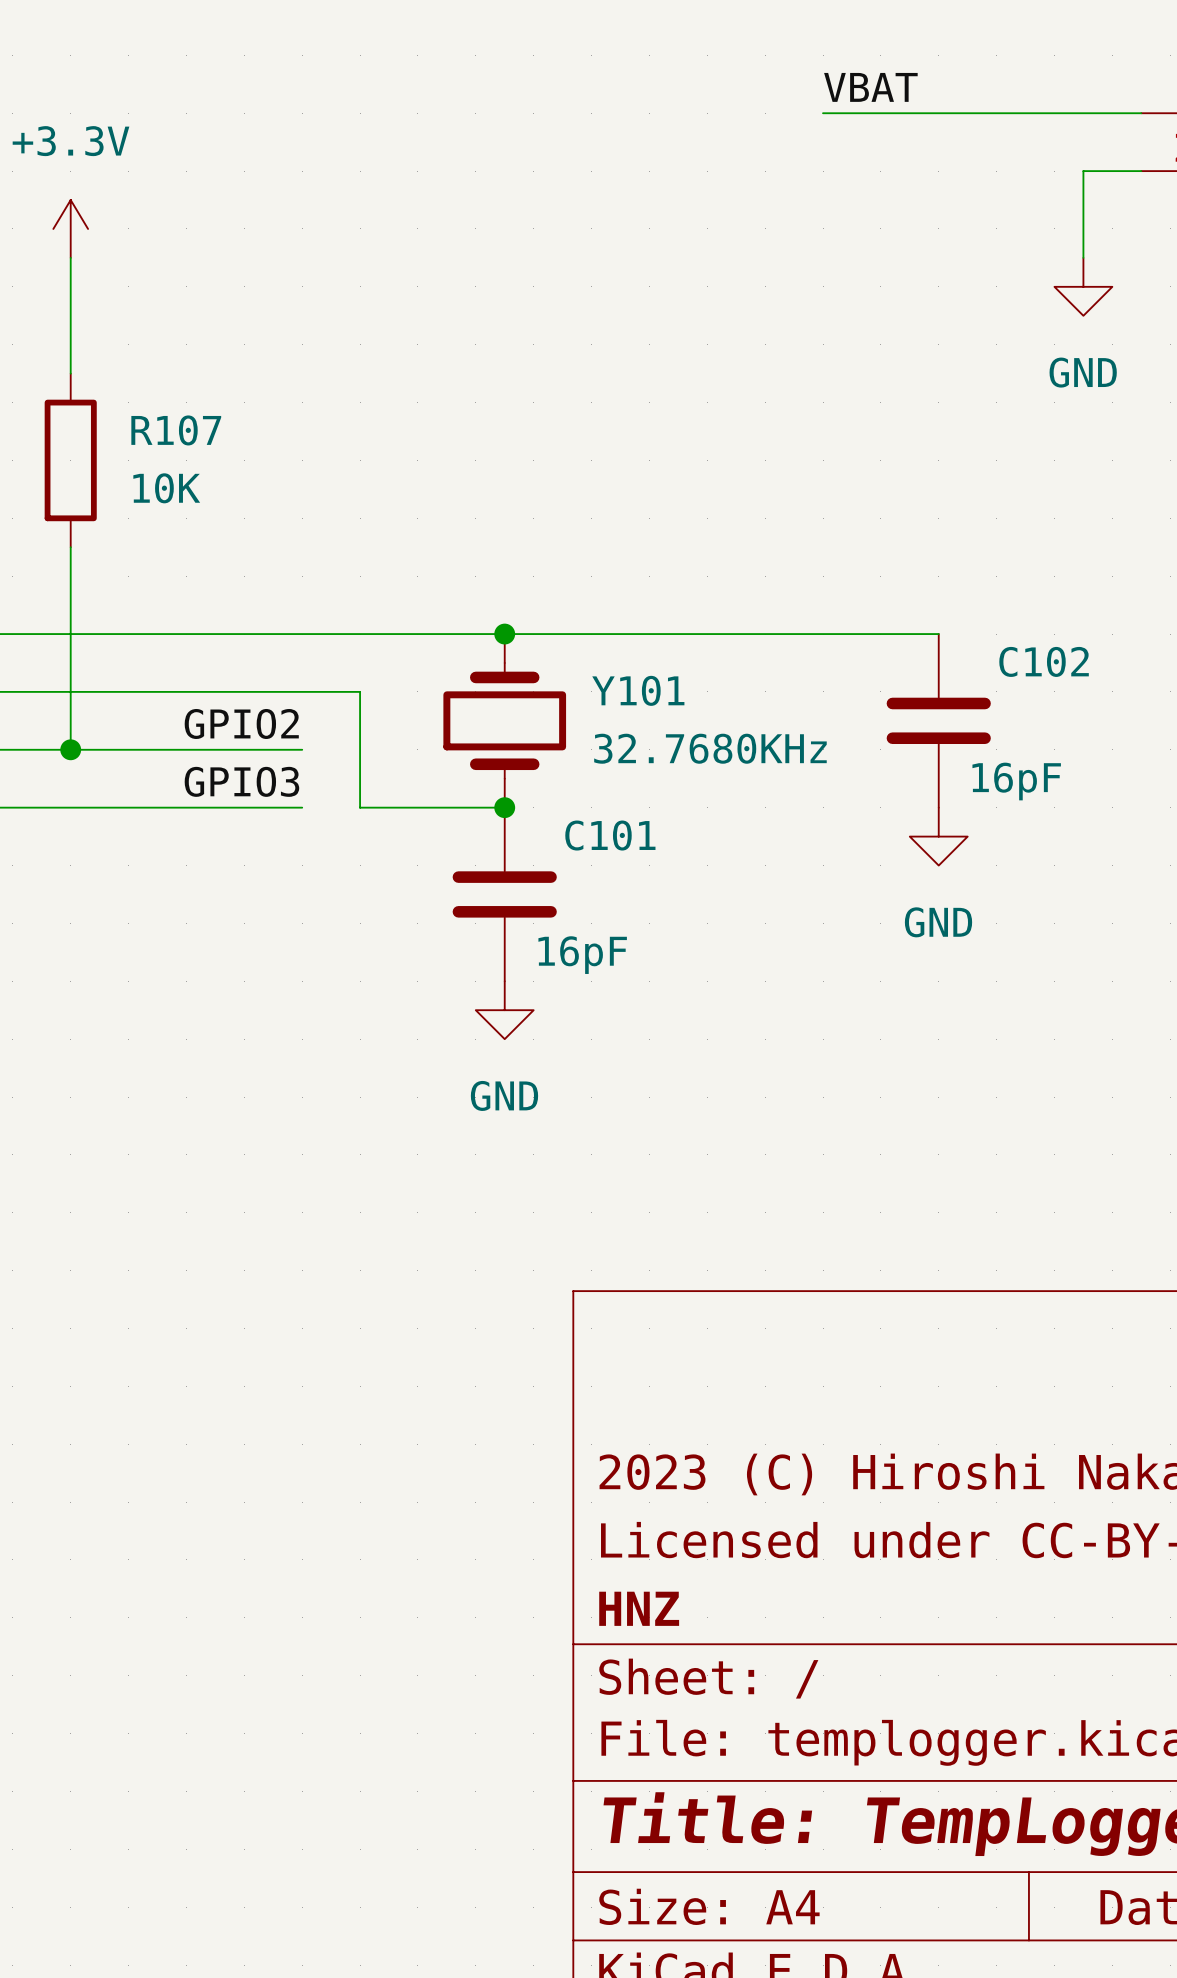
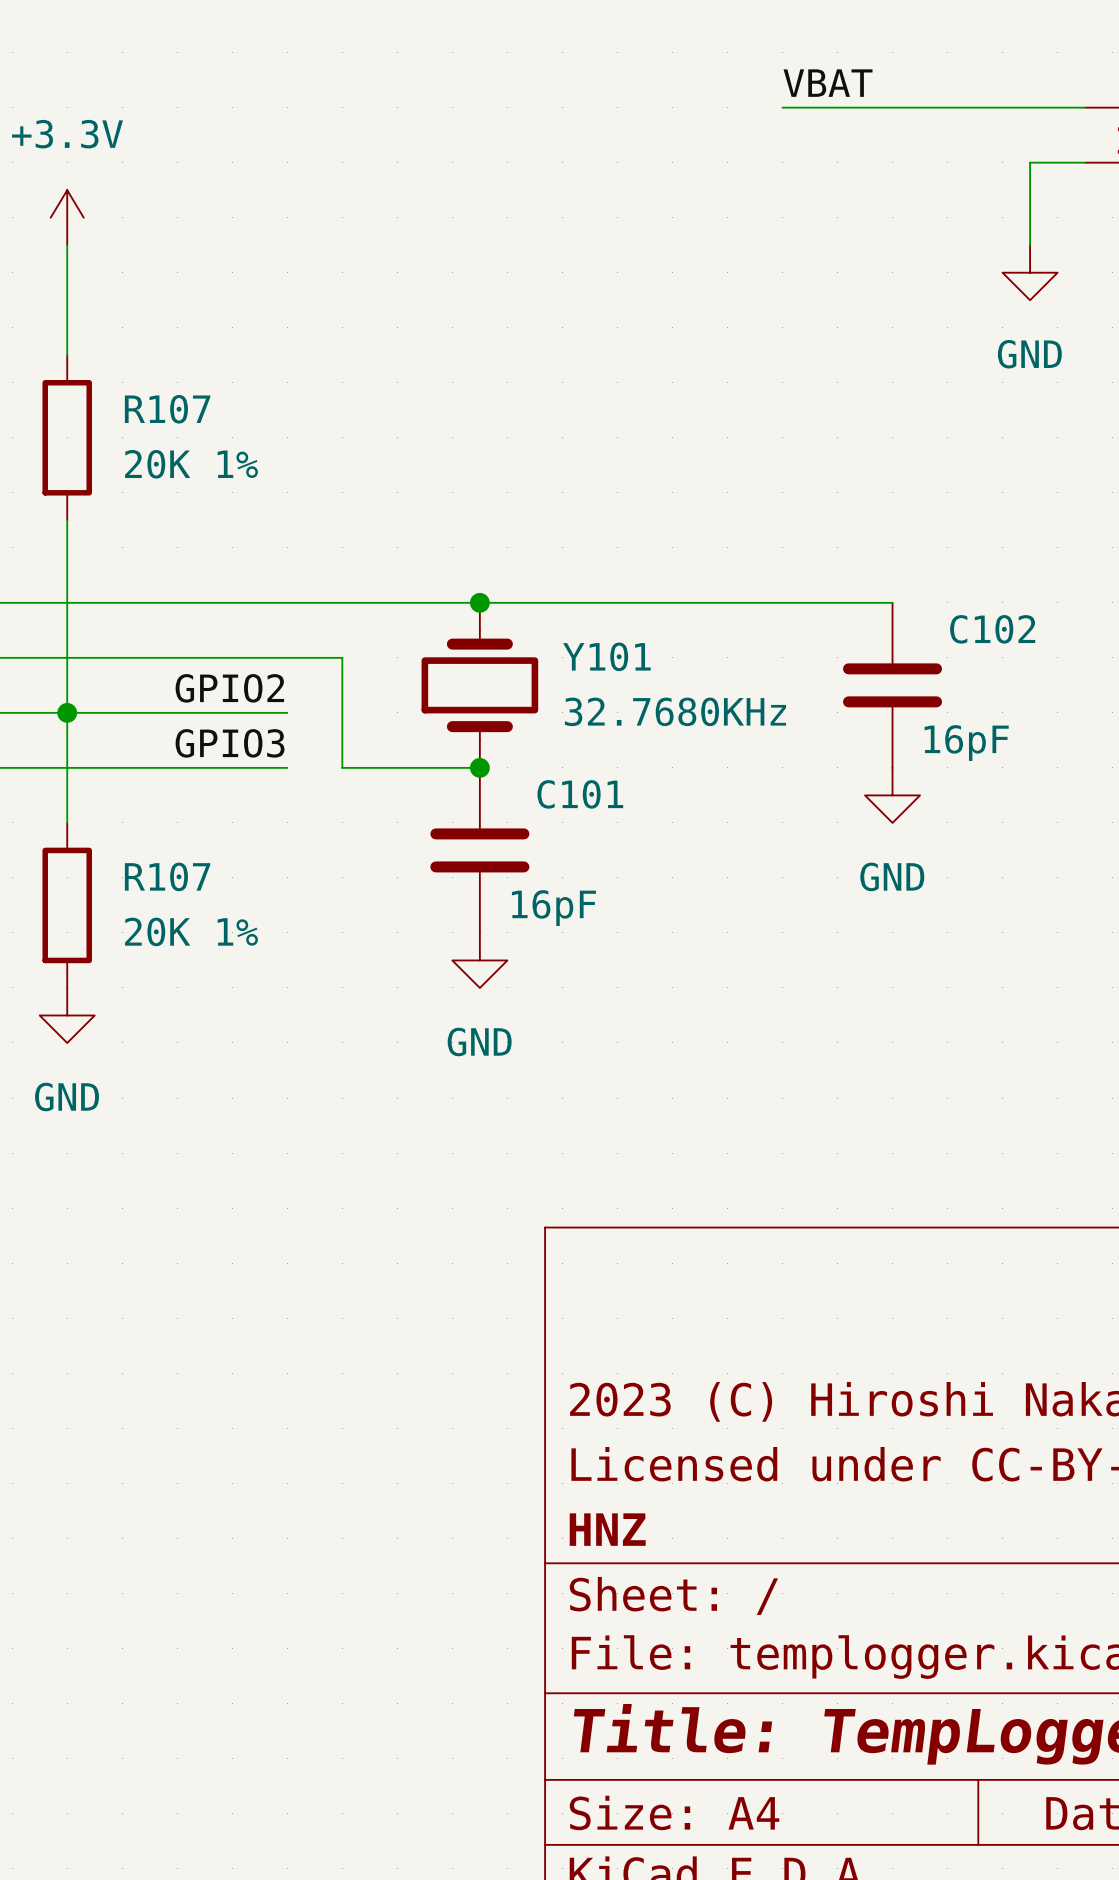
R107 value: 10K (166, 488) -> 20K 1% (191, 464)
wire: none -> (67, 712) (67, 822)
R107: none -> 20K 1% (67, 905)
power symbol: none -> GND (67, 1015)

